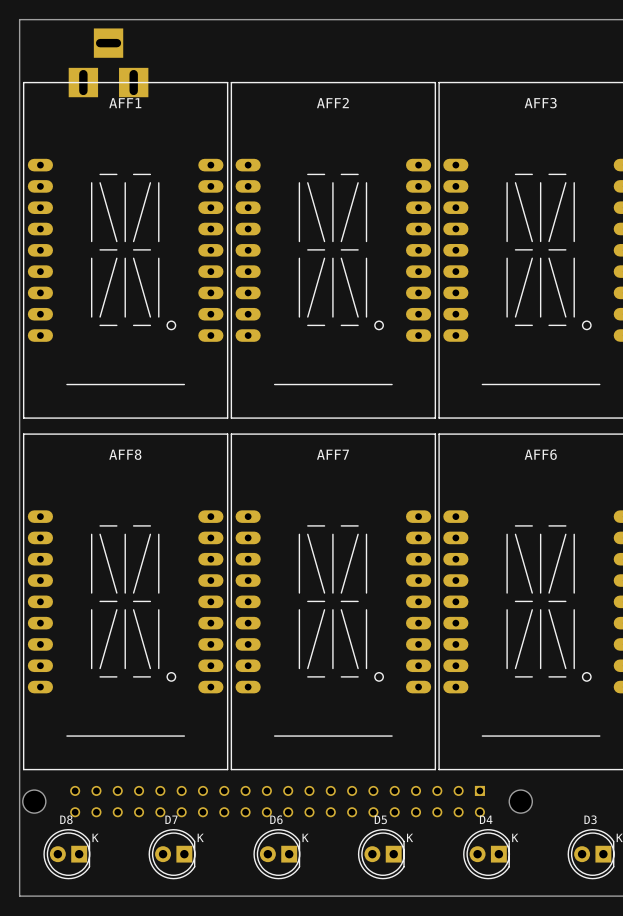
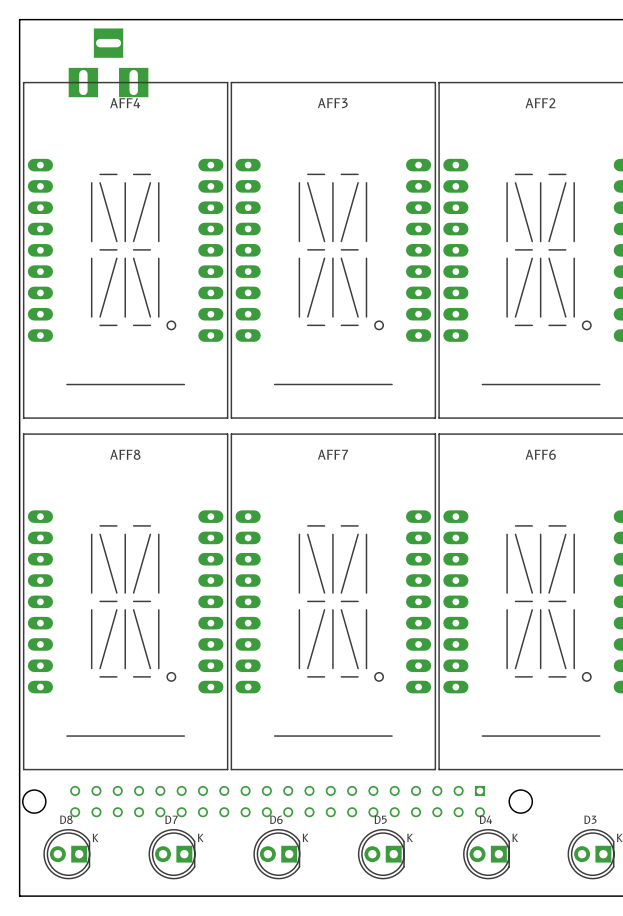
AFF1 name: AFF1 (125, 103) -> AFF4 (125, 103)
AFF2 name: AFF2 (332, 103) -> AFF3 (332, 103)
AFF3 name: AFF3 (540, 103) -> AFF2 (540, 103)

